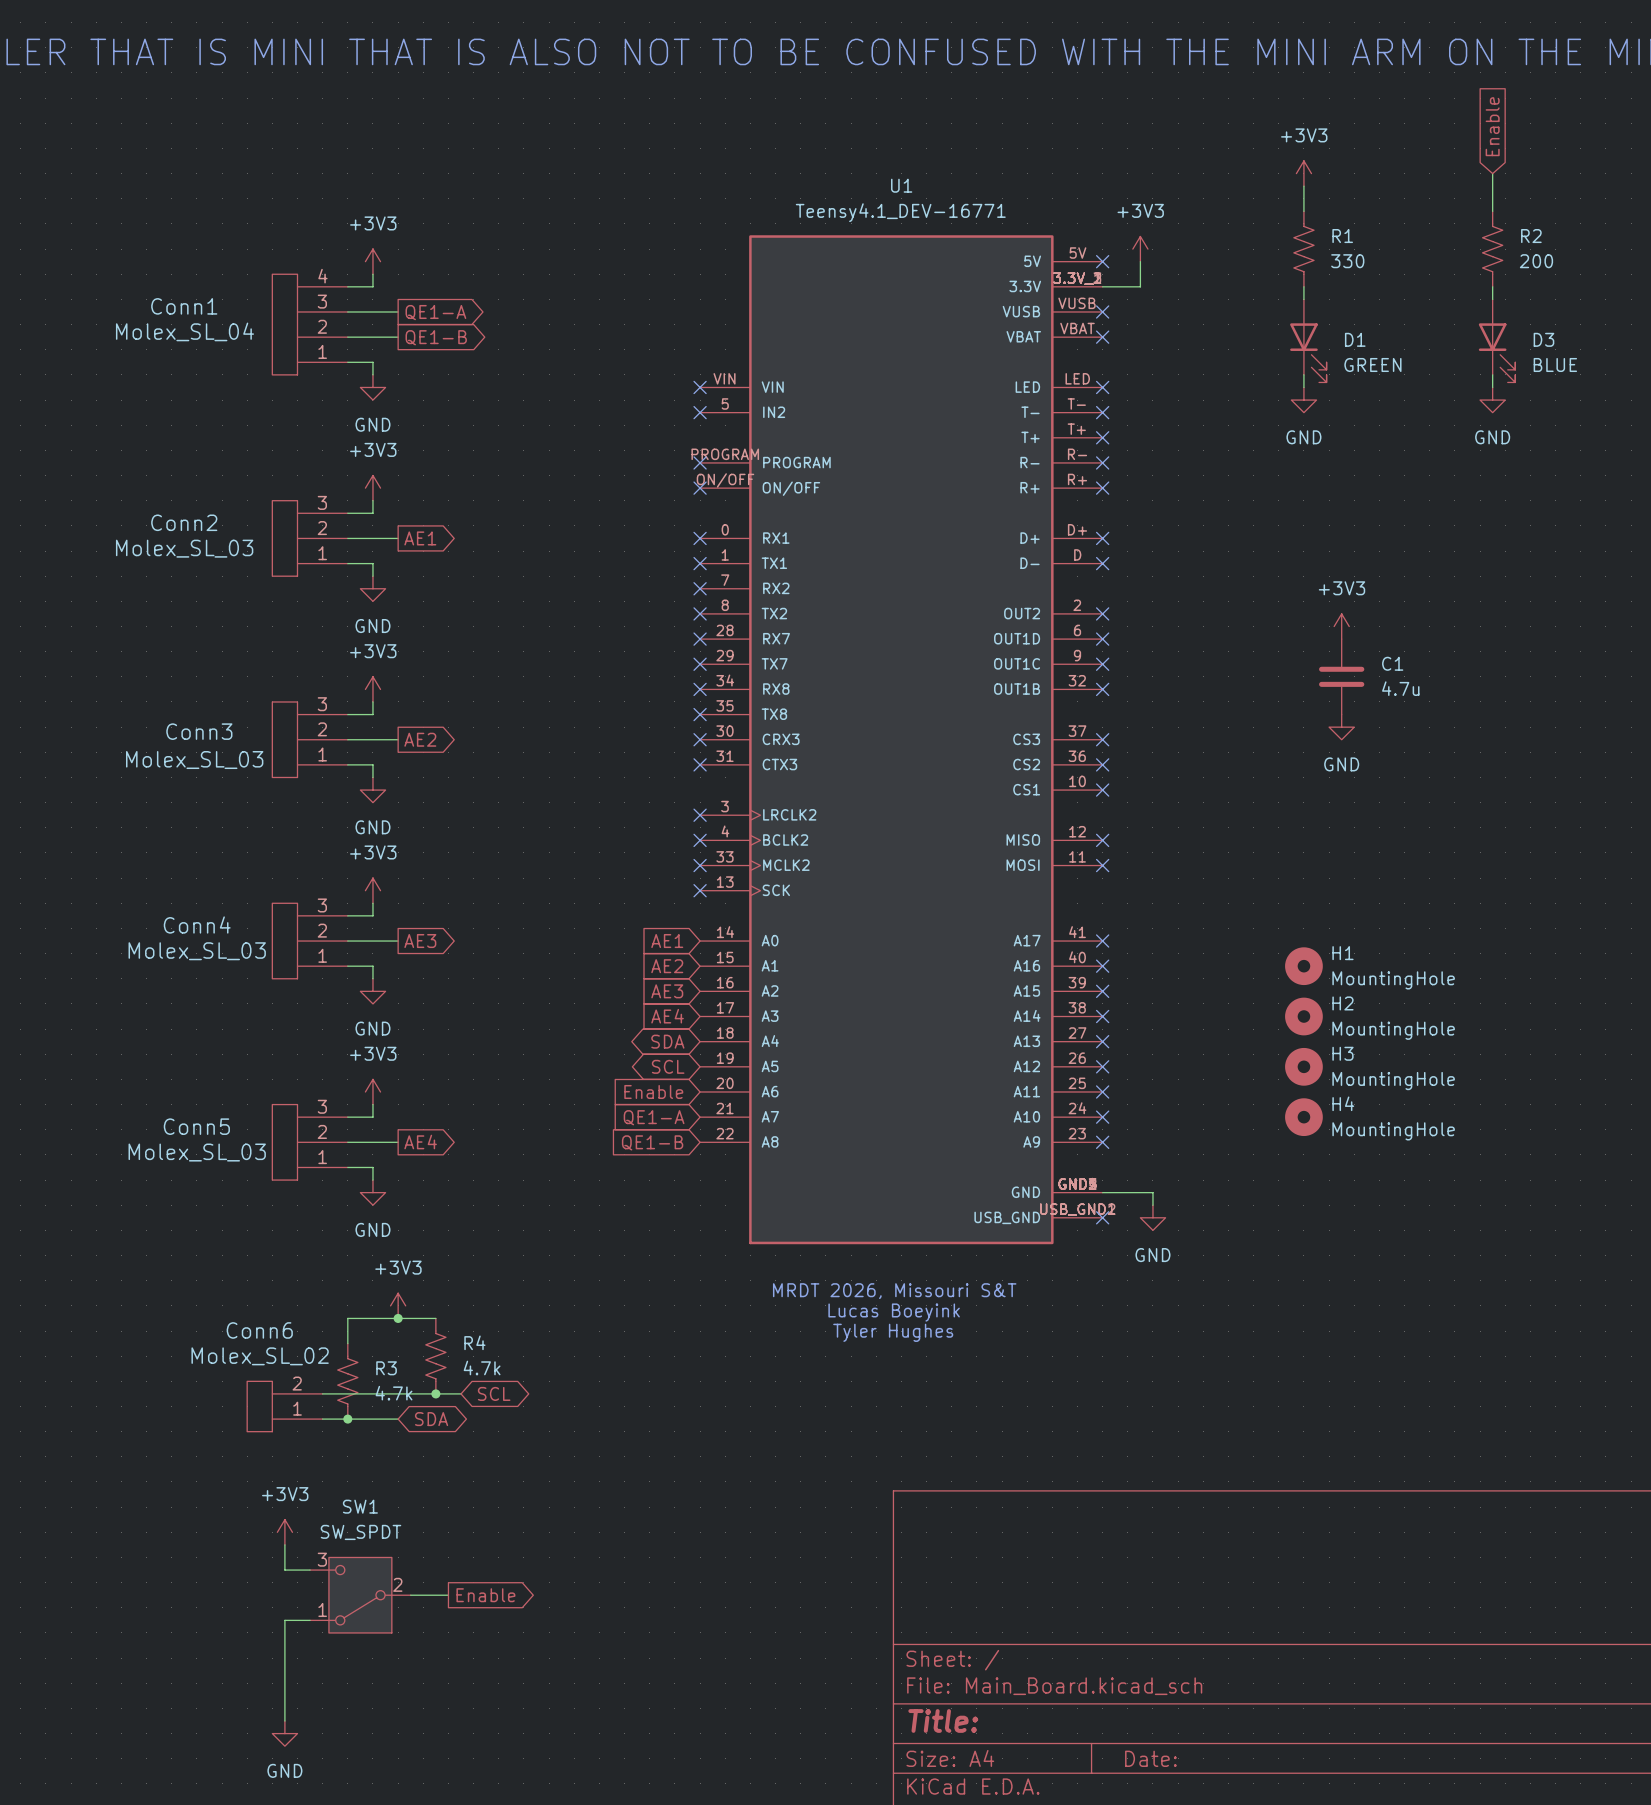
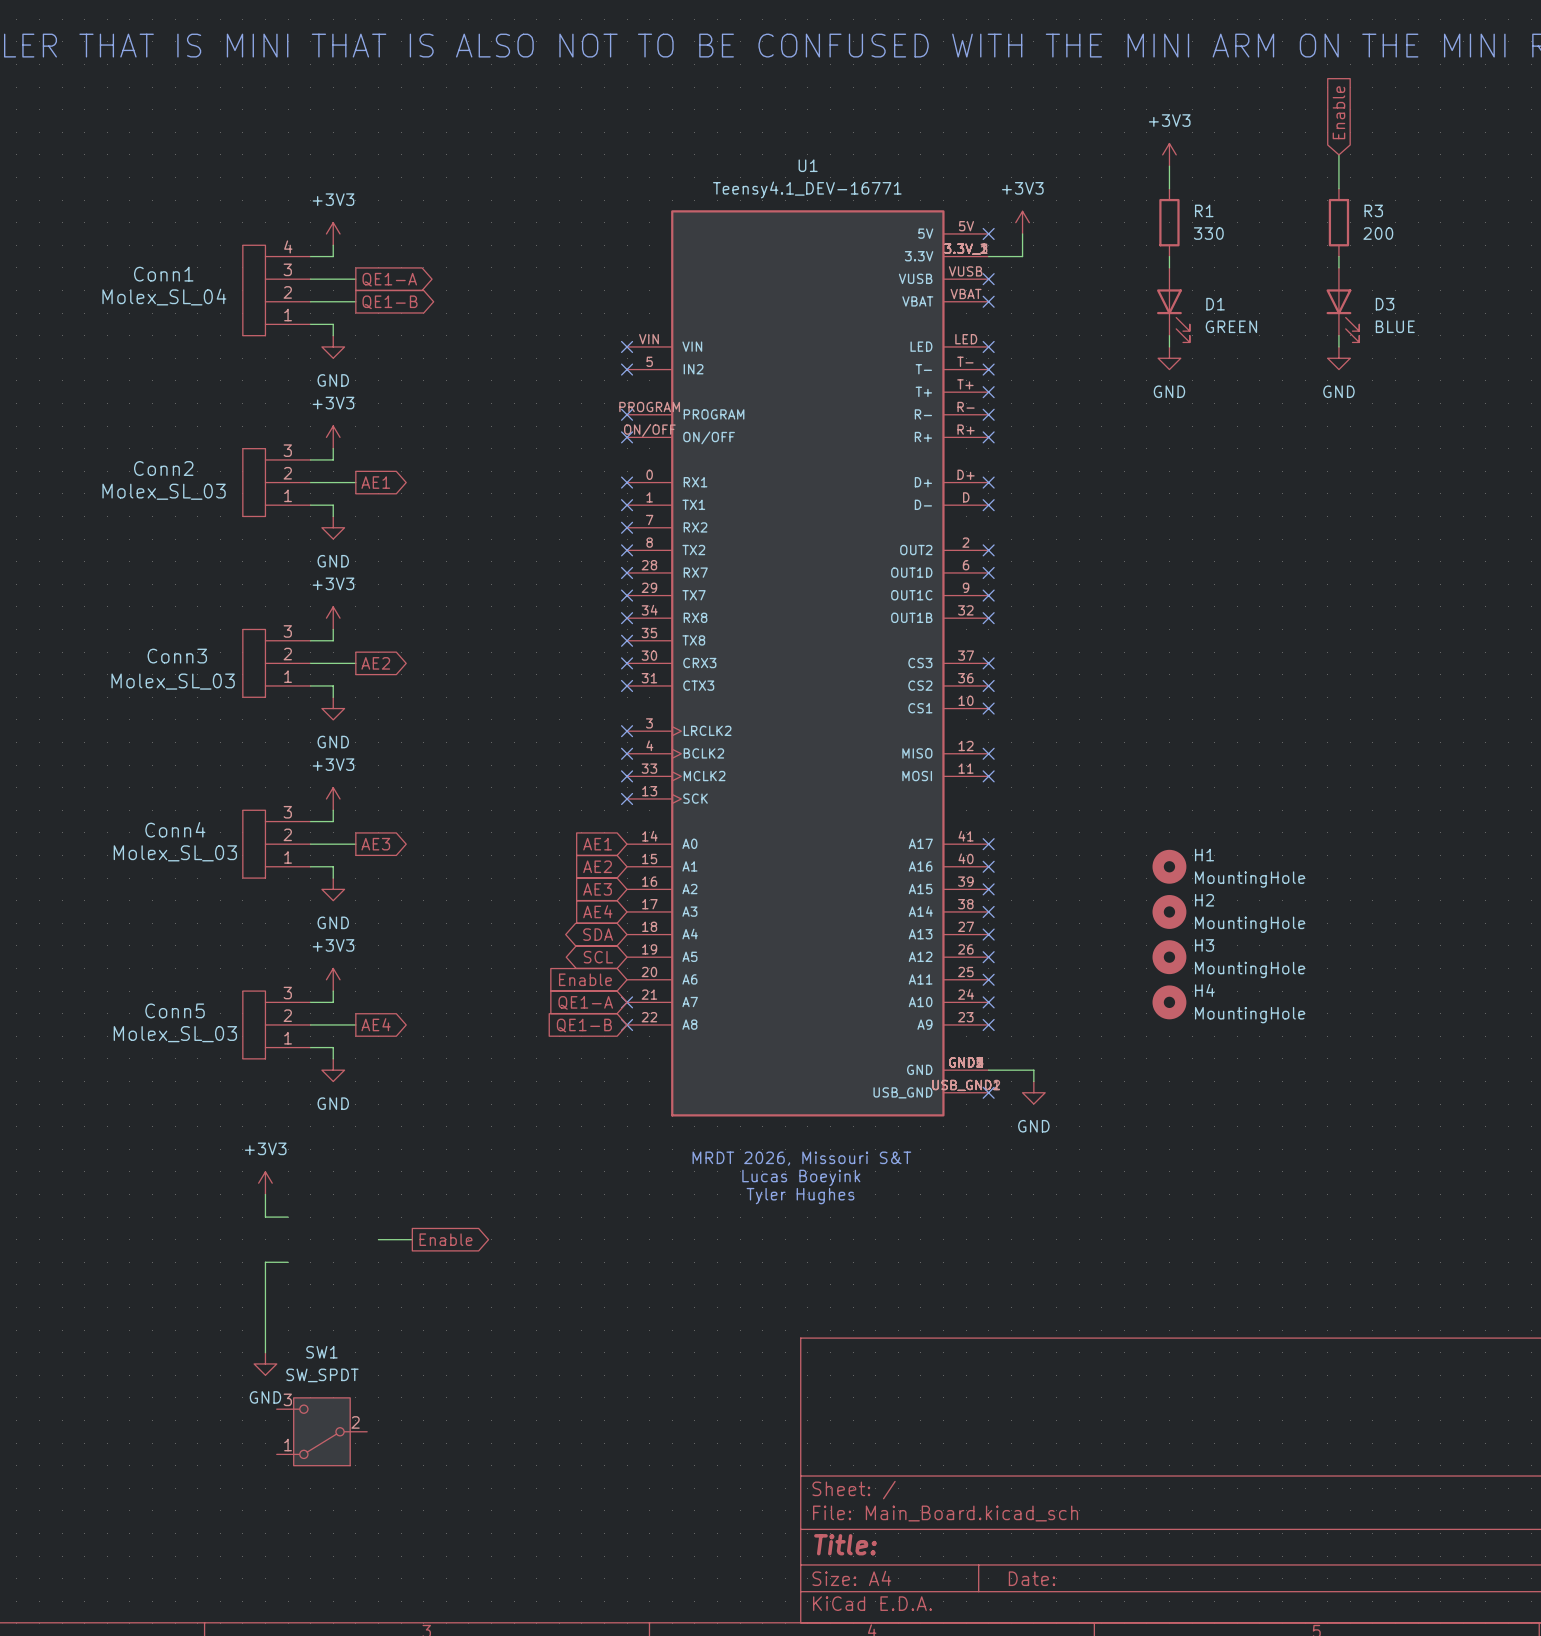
R1 symbol: [1293, 211, 1315, 287] -> [1159, 188, 1180, 257]
R2: 200 (1492, 249) -> none
power symbol: +3V3 (1341, 626) -> none
C1: 4.7u (1341, 676) -> none
power symbol: GND (1341, 727) -> none
no-connect mark: none -> (627, 1002)
no-connect mark: none -> (627, 1024)
power symbol position: +3V3 (398, 1305) -> +3V3 (265, 1183)
junction: (398, 1318) -> none
wire: (435, 1318) (347, 1318) (347, 1343) -> none
R3 symbol: [337, 1343, 358, 1420] -> [1328, 188, 1350, 257]
R4: 4.7k (435, 1356) -> none
wire: (322, 1393) (461, 1393) -> none
R3 value: 4.7k (394, 1393) -> 200 (1378, 233)
junction: (435, 1393) -> none
global label: SCL (494, 1393) -> none
Conn6: Molex_SL_02 (284, 1406) -> none
wire: (322, 1419) (398, 1419) -> none
junction: (347, 1419) -> none
global label: SDA (431, 1419) -> none
power symbol: +3V3 (284, 1532) -> none
wire: (284, 1544) (284, 1570) (310, 1570) -> (265, 1194) (265, 1217) (288, 1217)
wire: (410, 1595) (448, 1595) -> (378, 1239) (412, 1239)
global label position: Enable (485, 1595) -> Enable (445, 1239)
wire: (310, 1620) (284, 1620) (284, 1721) -> (288, 1262) (265, 1262) (265, 1352)
power symbol position: GND (284, 1733) -> GND (265, 1363)

